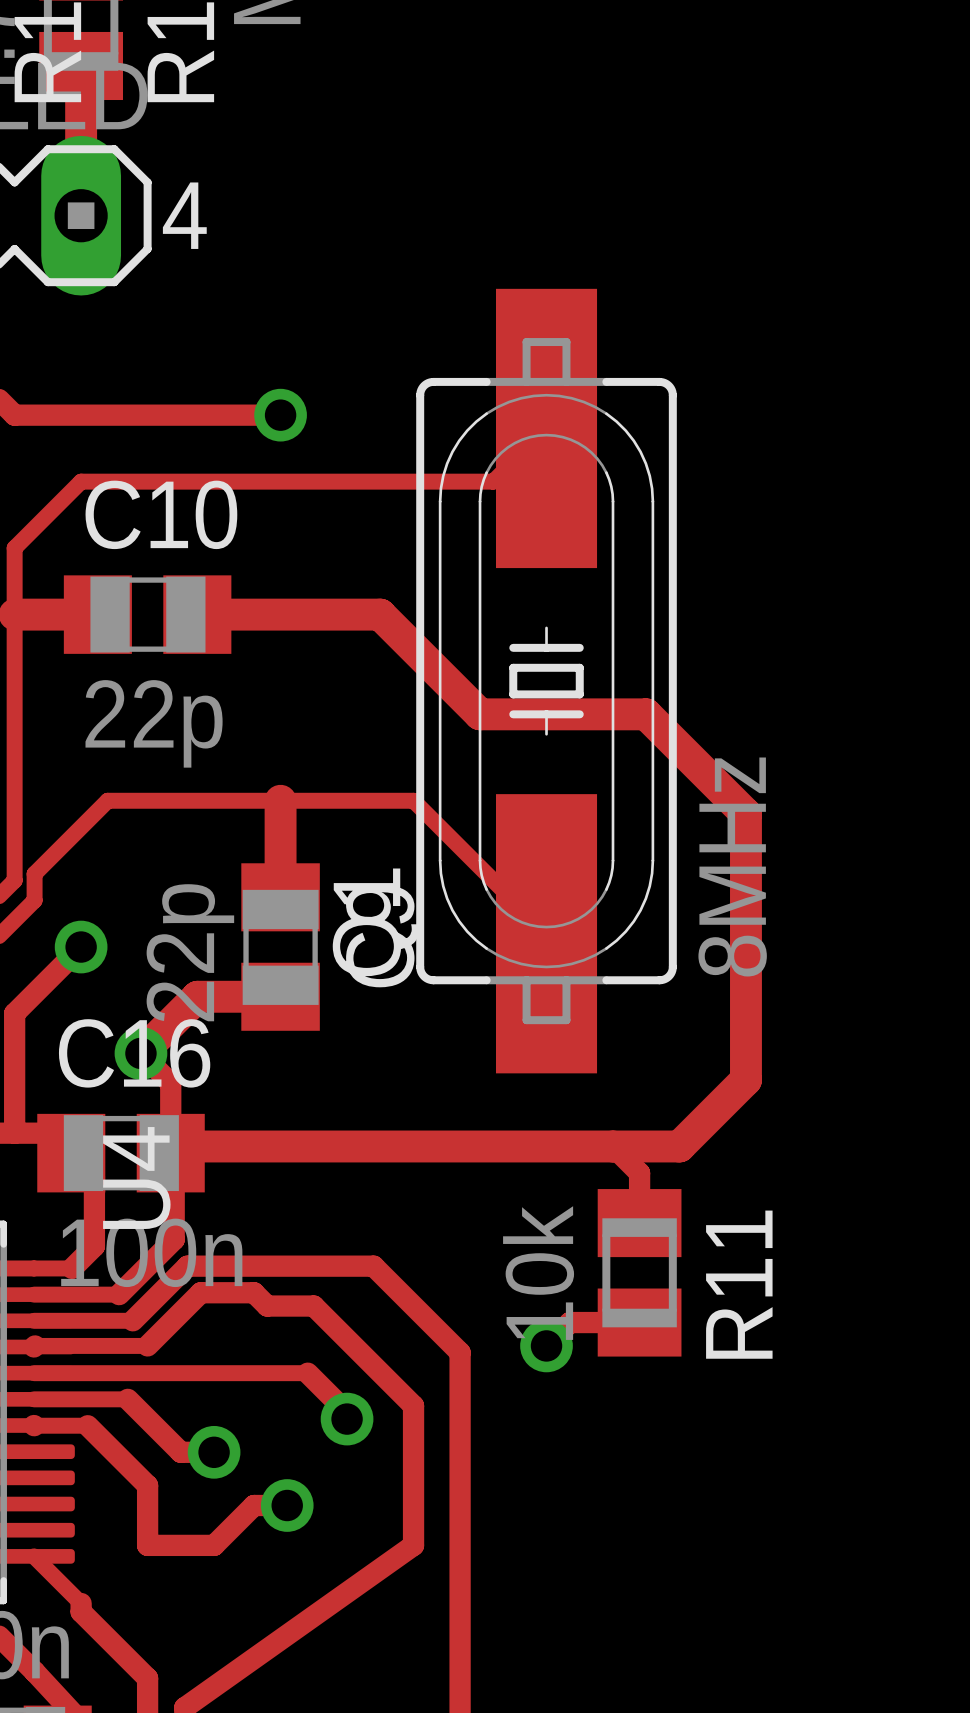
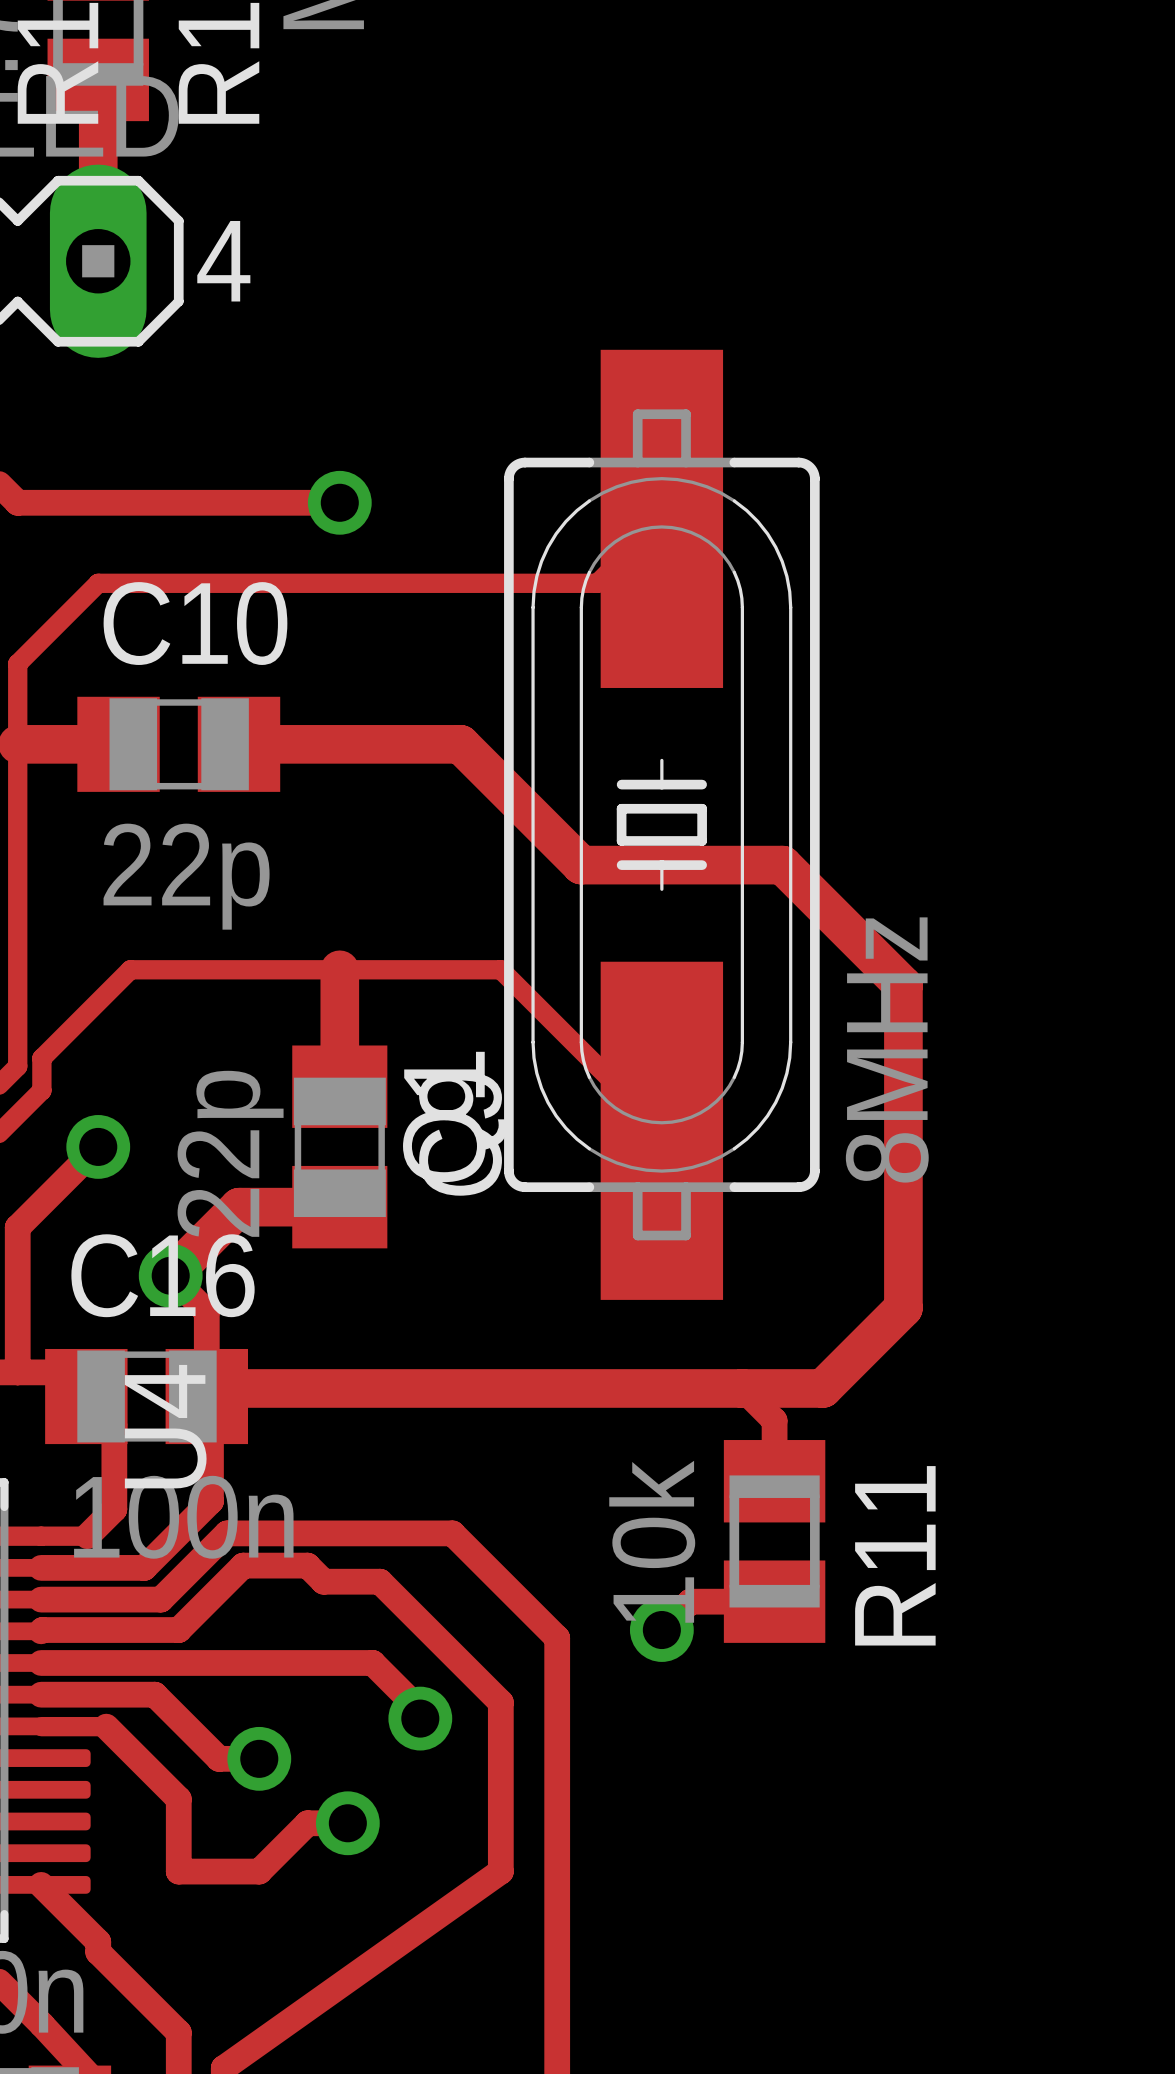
track width: thin (34, 1294) (119, 1294) -> thick (41, 1567) (144, 1567)
track width: thin (34, 1320) (132, 1320) -> thick (41, 1599) (160, 1599)
track width: thin (35, 1345) (147, 1345) -> thick (42, 1630) (178, 1630)
track width: thin (34, 1373) (307, 1373) -> thick (41, 1662) (372, 1662)
track width: thin (34, 1399) (127, 1399) -> thick (41, 1694) (154, 1694)
track width: thin (34, 1556) (81, 1603) -> thick (41, 1884) (98, 1941)

